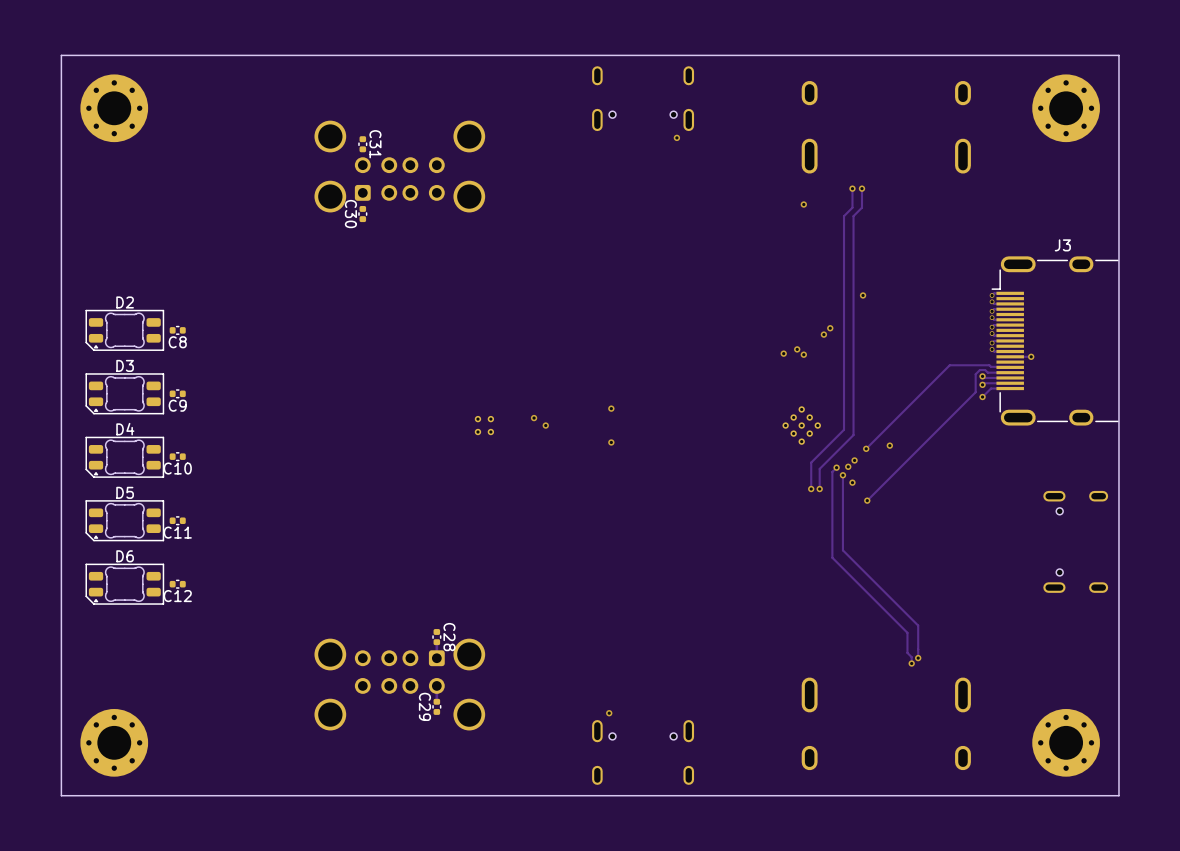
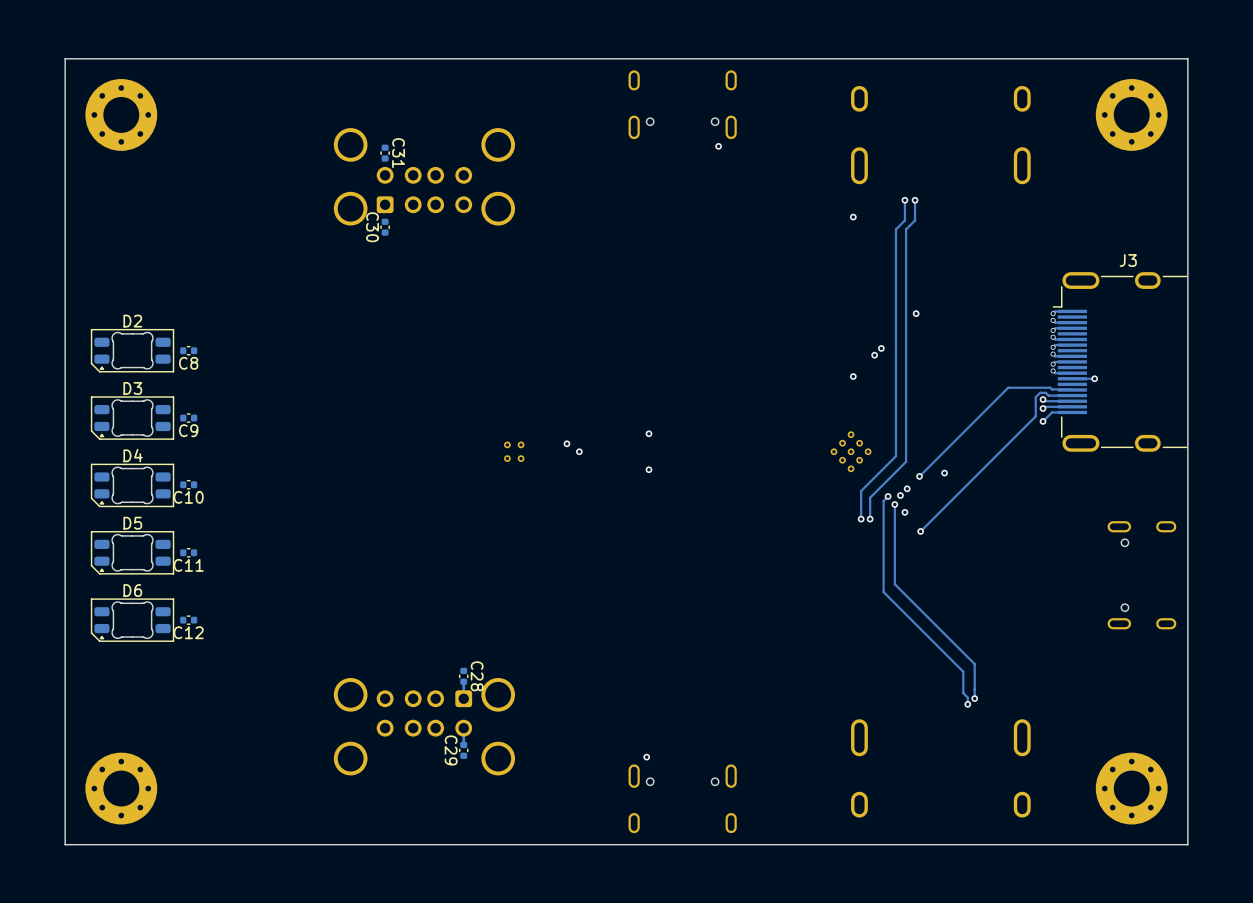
via: (797, 349) -> none
via: (783, 353) -> none

